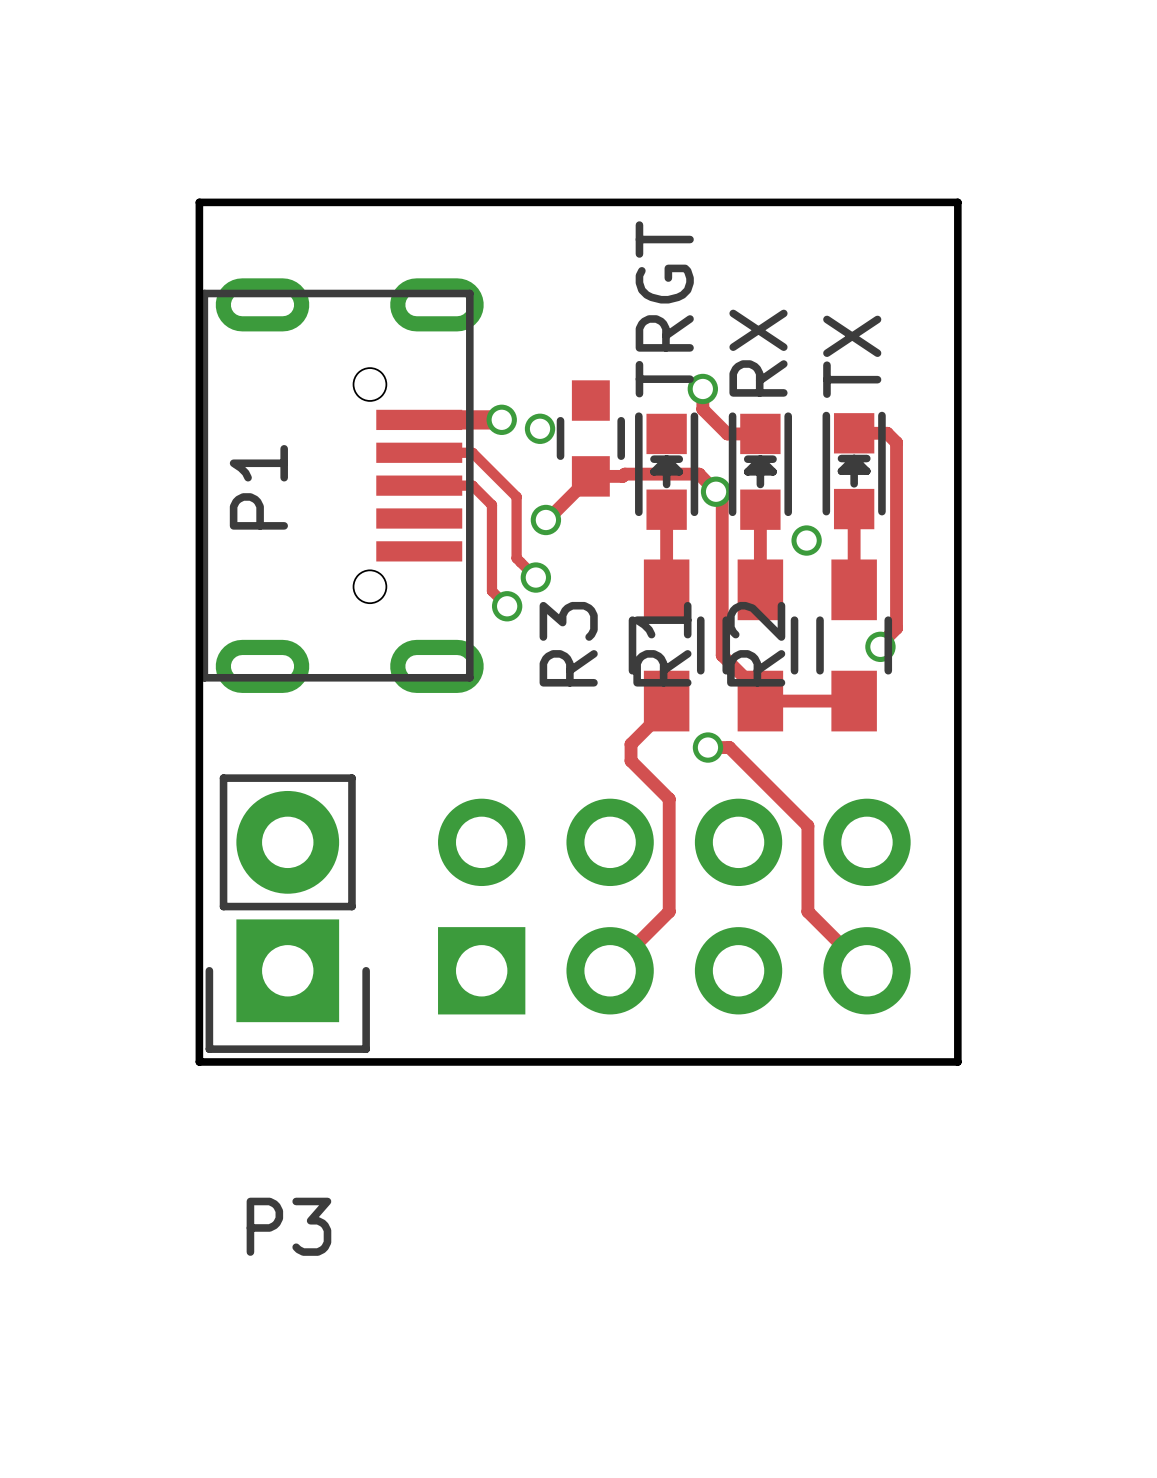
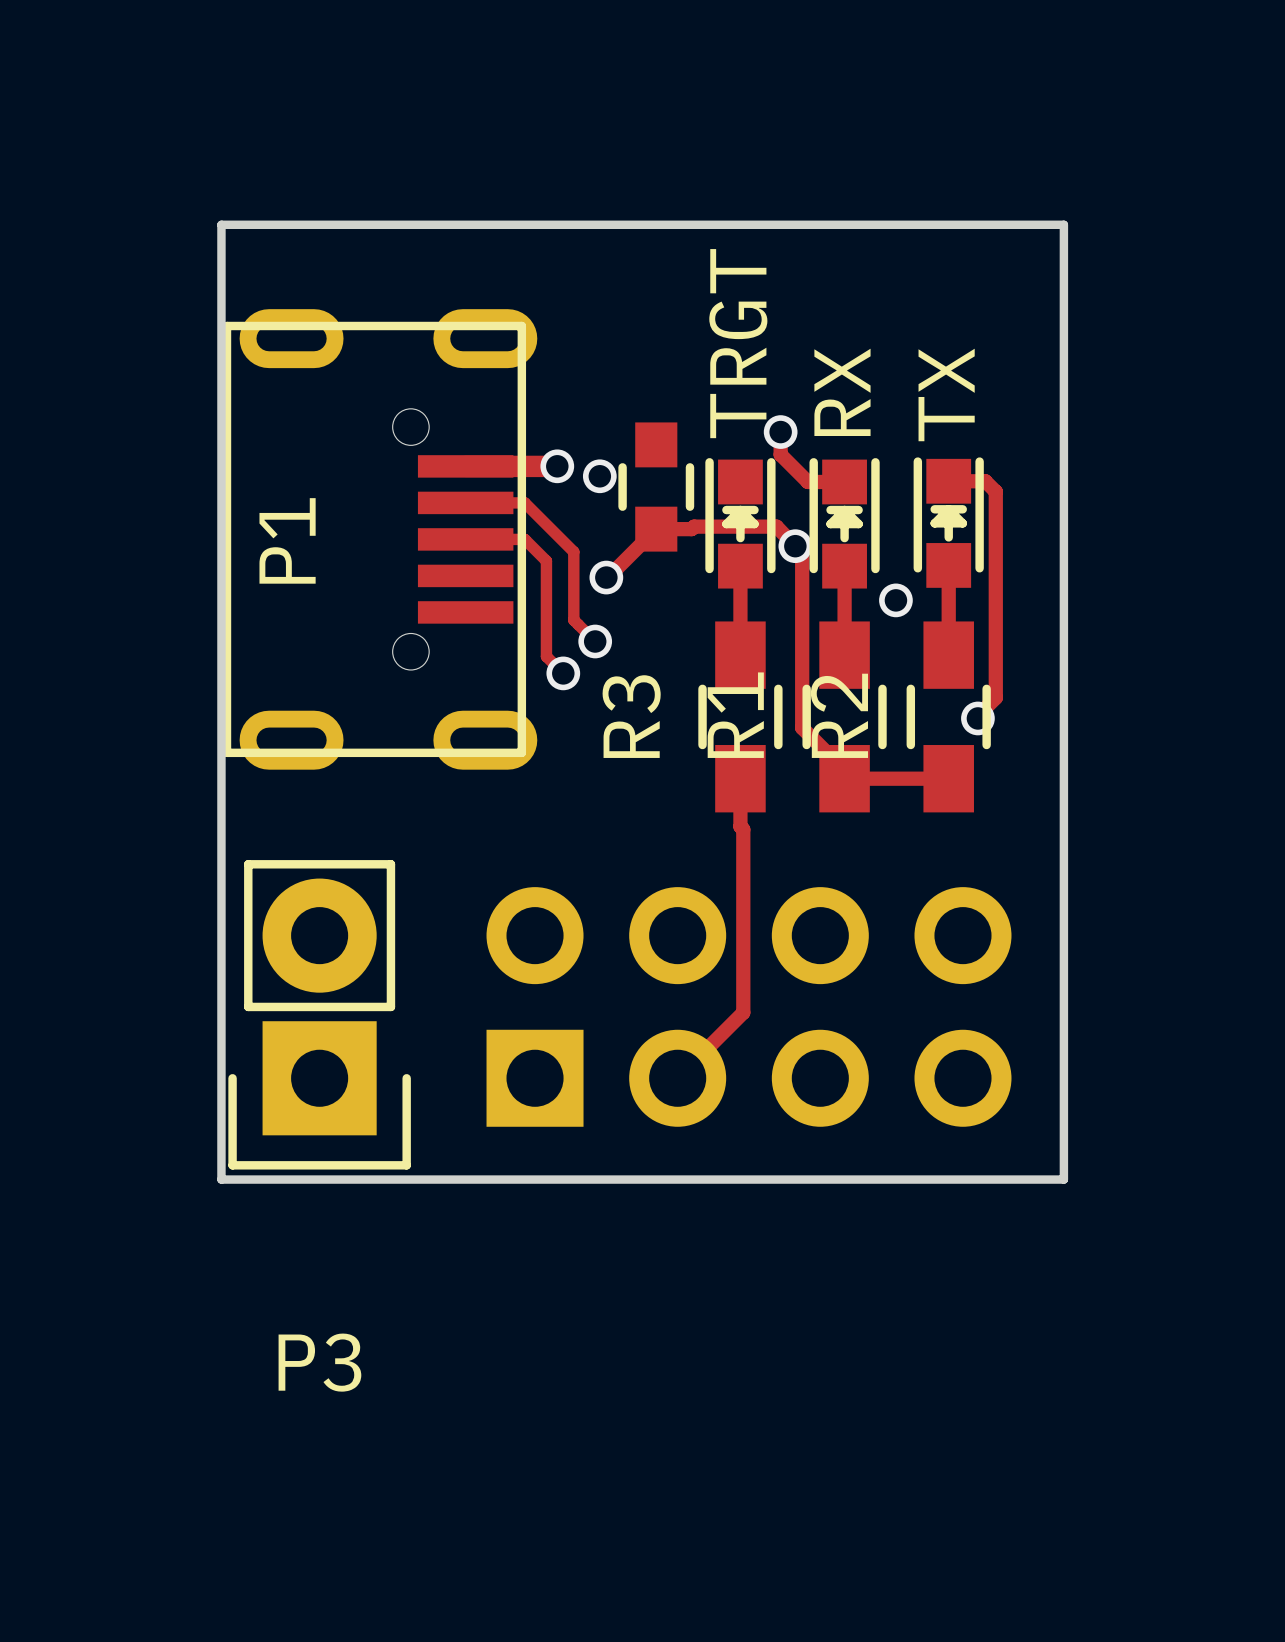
track: (666, 708) (631, 744) (631, 760) (669, 799) -> (740, 787) (740, 826) (743, 829) (743, 887)
track: (707, 747) (729, 747) (807, 826) (807, 911) (866, 970) -> none
via: (707, 747) -> none

